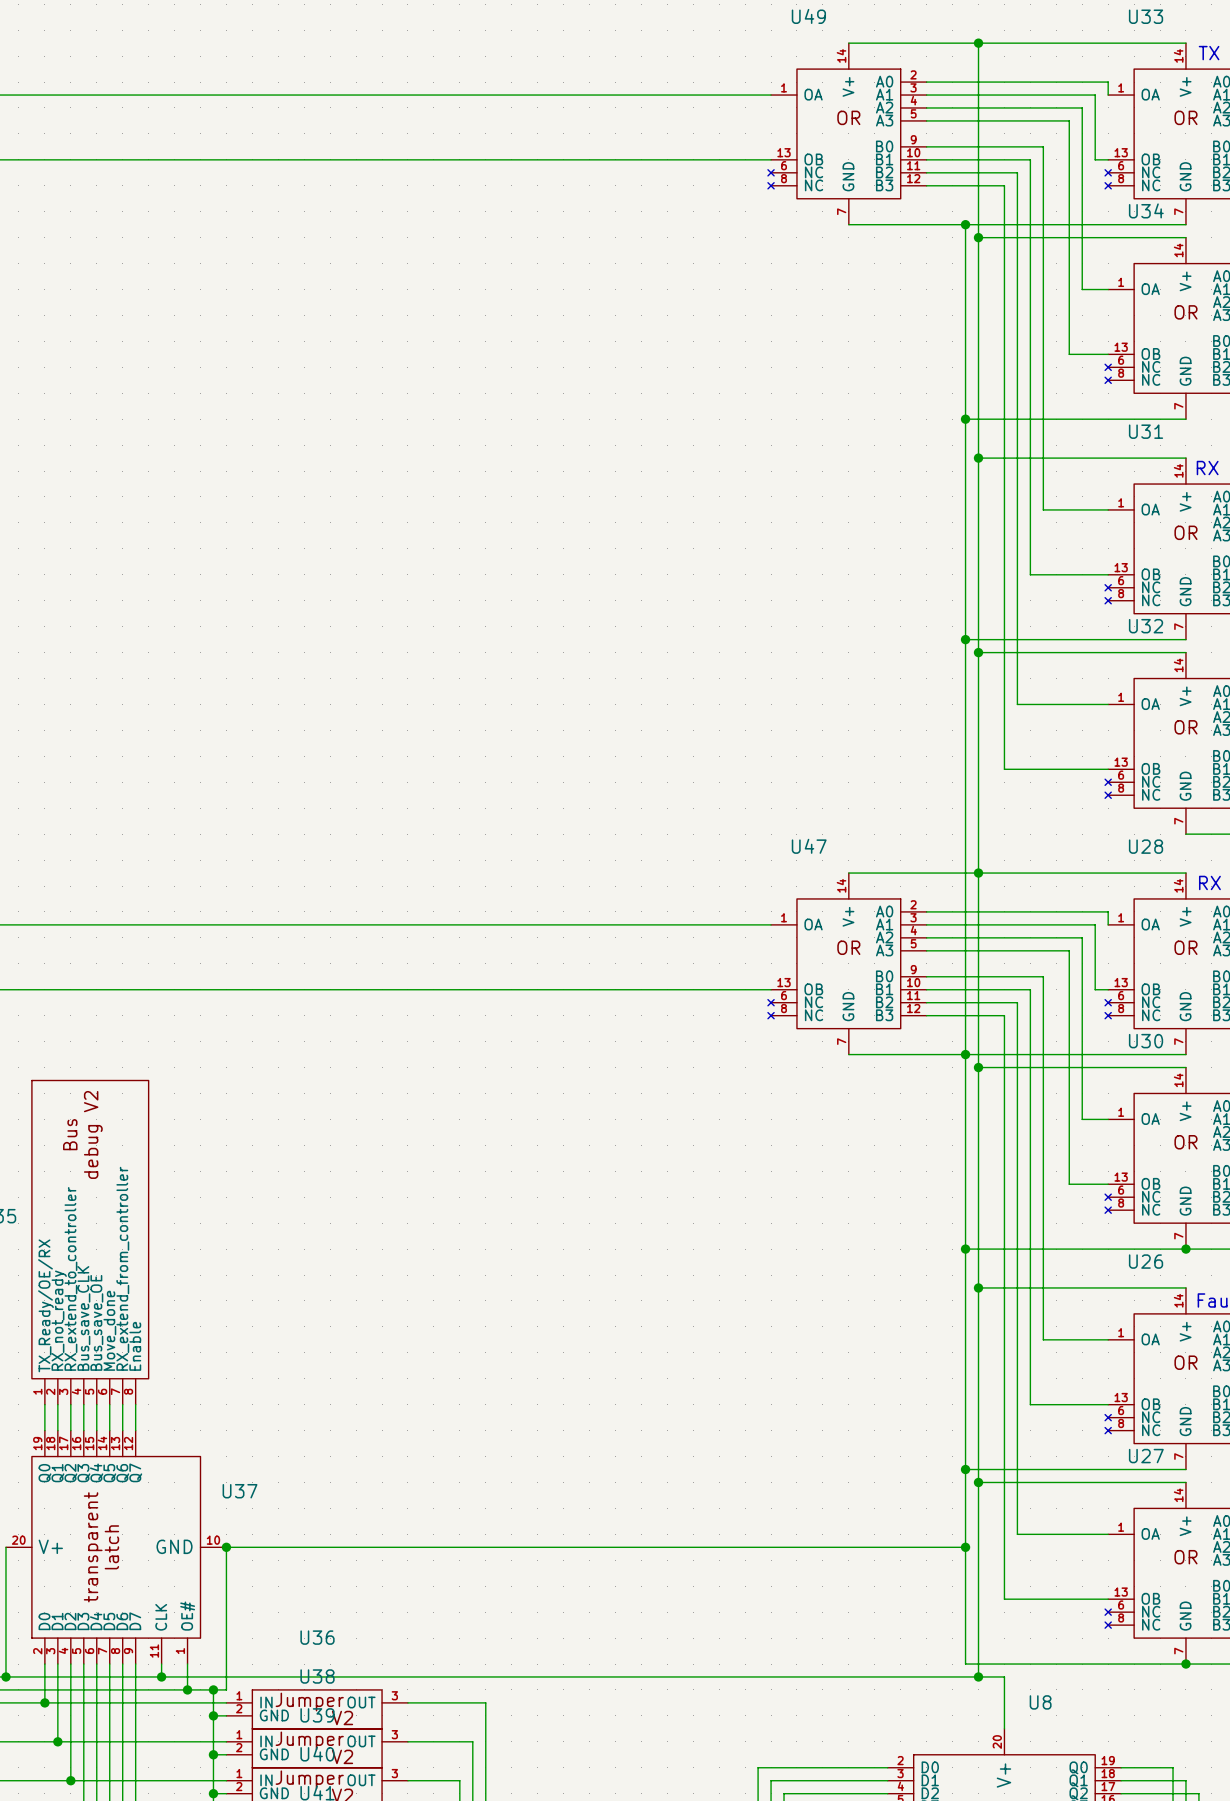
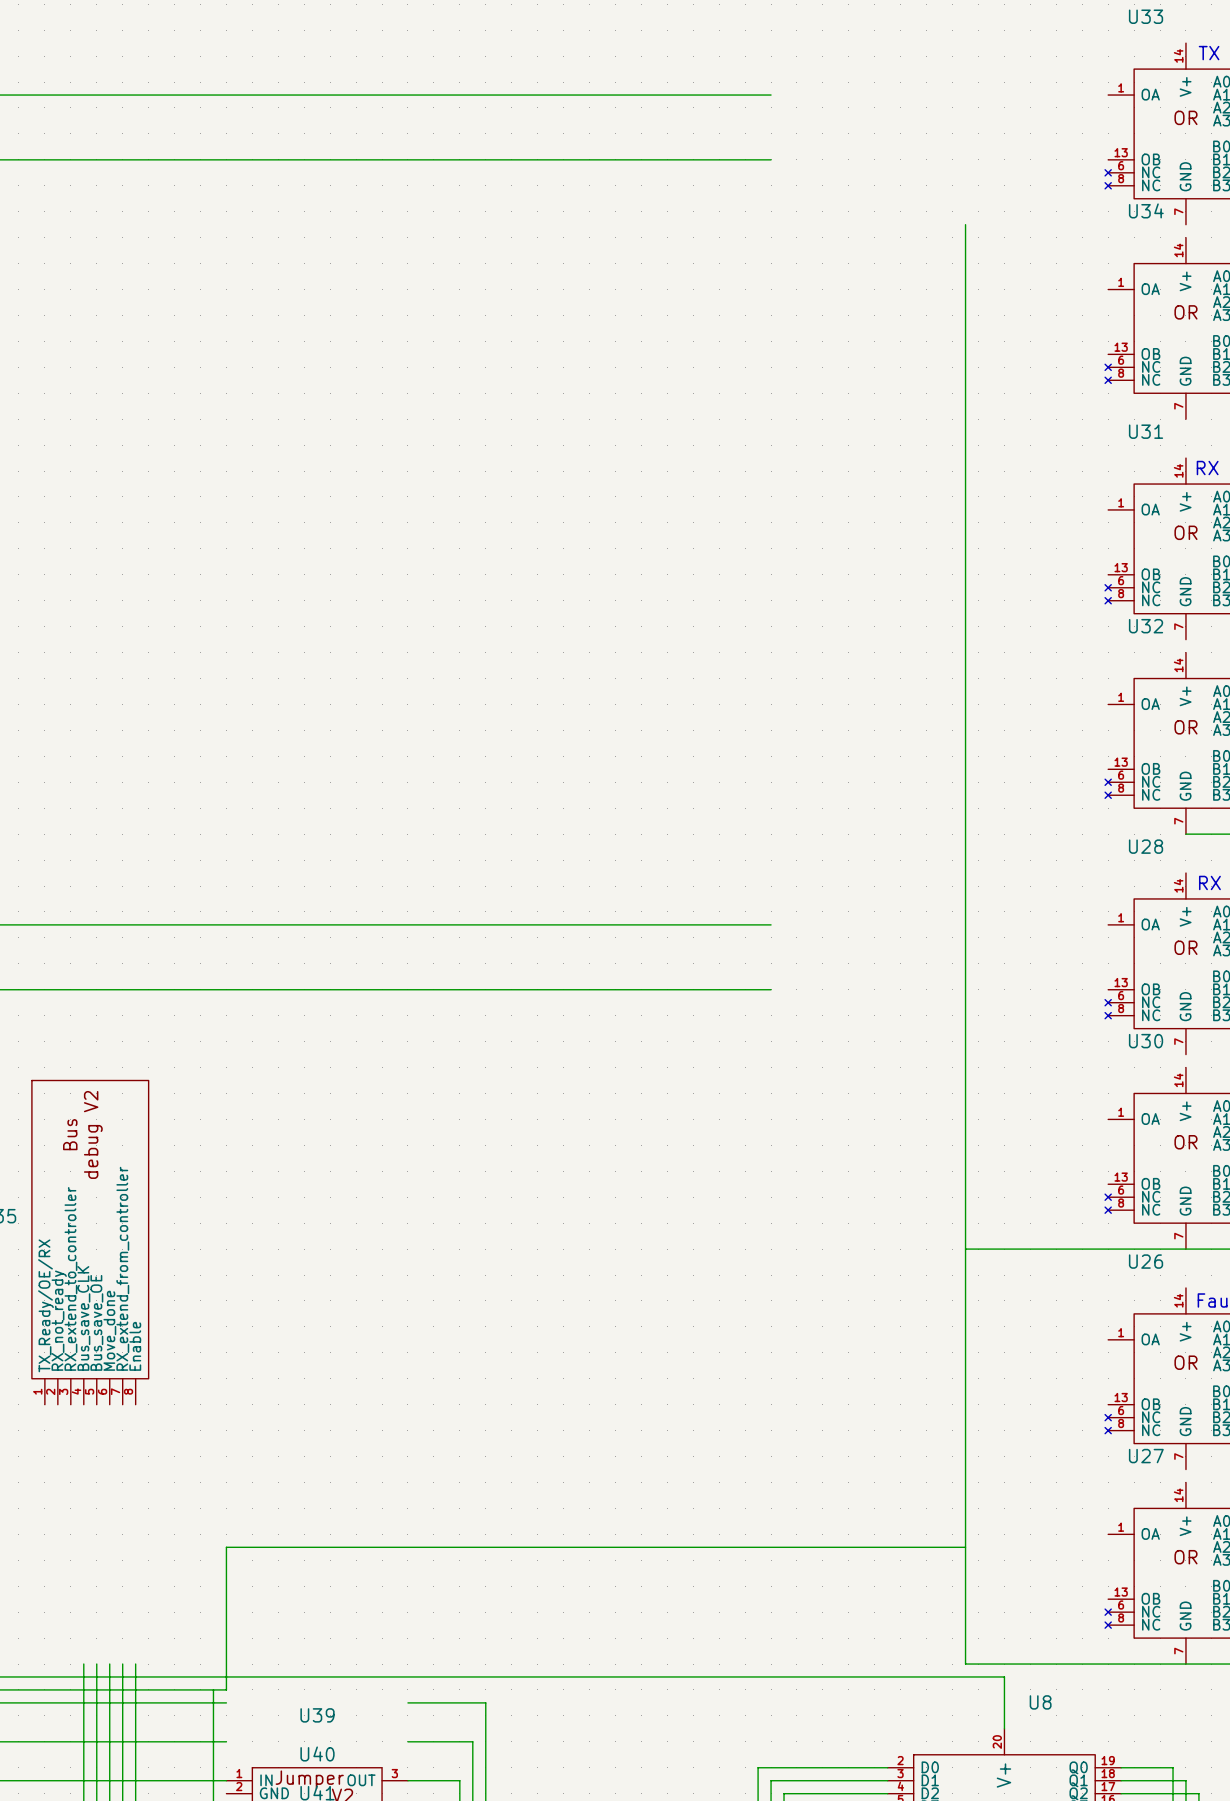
wire: (848, 43) (1185, 43) -> none
wire: (978, 43) (978, 1676) -> none
junction: (978, 43) -> none
wire: (926, 82) (1108, 82) (1108, 95) -> none
wire: (926, 95) (1095, 95) (1095, 159) (1108, 159) -> none
wire: (926, 107) (1082, 107) (1082, 289) (1108, 289) -> none
wire: (926, 120) (1069, 120) (1069, 354) (1108, 354) -> none
U49: (847, 133) -> none
wire: (926, 146) (1043, 146) (1043, 509) (1108, 509) -> none
wire: (926, 159) (1030, 159) (1030, 574) (1108, 574) -> none
wire: (926, 172) (1017, 172) (1017, 704) (1108, 704) -> none
wire: (926, 185) (1004, 185) (1004, 769) (1108, 769) -> none
wire: (848, 224) (1185, 224) -> none
junction: (965, 224) -> none
wire: (978, 237) (1185, 237) -> none
junction: (978, 237) -> none
wire: (965, 419) (1185, 419) -> none
junction: (965, 419) -> none
wire: (978, 458) (1185, 458) -> none
junction: (978, 458) -> none
wire: (965, 639) (1185, 639) -> none
junction: (965, 639) -> none
wire: (978, 652) (1185, 652) -> none
junction: (978, 652) -> none
wire: (848, 873) (1185, 873) -> none
junction: (978, 873) -> none
wire: (926, 911) (1108, 911) (1108, 924) -> none
wire: (926, 924) (1095, 924) (1095, 989) (1108, 989) -> none
wire: (926, 937) (1082, 937) (1082, 1119) (1108, 1119) -> none
wire: (926, 950) (1069, 950) (1069, 1184) (1108, 1184) -> none
U47: (847, 963) -> none
wire: (926, 976) (1043, 976) (1043, 1339) (1108, 1339) -> none
wire: (926, 989) (1030, 989) (1030, 1404) (1108, 1404) -> none
wire: (926, 1002) (1017, 1002) (1017, 1534) (1108, 1534) -> none
wire: (926, 1015) (1004, 1015) (1004, 1599) (1108, 1599) -> none
wire: (848, 1054) (1185, 1054) -> none
junction: (965, 1054) -> none
wire: (978, 1067) (1185, 1067) -> none
junction: (978, 1067) -> none
junction: (965, 1249) -> none
junction: (1185, 1249) -> none
wire: (978, 1287) (1185, 1287) -> none
junction: (978, 1287) -> none
wire: (44, 1404) (44, 1430) -> none
wire: (57, 1404) (57, 1430) -> none
wire: (70, 1404) (70, 1430) -> none
wire: (83, 1404) (83, 1430) -> none
wire: (96, 1404) (96, 1430) -> none
wire: (109, 1404) (109, 1430) -> none
wire: (122, 1404) (122, 1430) -> none
wire: (135, 1404) (135, 1430) -> none
wire: (965, 1469) (1185, 1469) -> none
junction: (965, 1469) -> none
wire: (978, 1482) (1185, 1482) -> none
junction: (978, 1482) -> none
wire: (5, 1547) (5, 1676) -> none
U37: (116, 1547) -> none
junction: (226, 1547) -> none
junction: (965, 1547) -> none
wire: (44, 1664) (44, 1702) -> none
wire: (57, 1664) (57, 1741) -> none
wire: (70, 1664) (70, 1780) -> none
wire: (161, 1664) (161, 1676) -> none
wire: (187, 1664) (187, 1689) -> none
junction: (1185, 1664) -> none
junction: (5, 1676) -> none
junction: (161, 1676) -> none
junction: (978, 1676) -> none
junction: (187, 1689) -> none
junction: (213, 1689) -> none
junction: (44, 1702) -> none
U36: (317, 1709) -> none
wire: (213, 1715) (226, 1715) -> none
junction: (213, 1715) -> none
junction: (57, 1741) -> none
U38: (317, 1748) -> none
wire: (213, 1754) (226, 1754) -> none
junction: (213, 1754) -> none
junction: (70, 1780) -> none
wire: (213, 1793) (226, 1793) -> none
junction: (213, 1793) -> none

